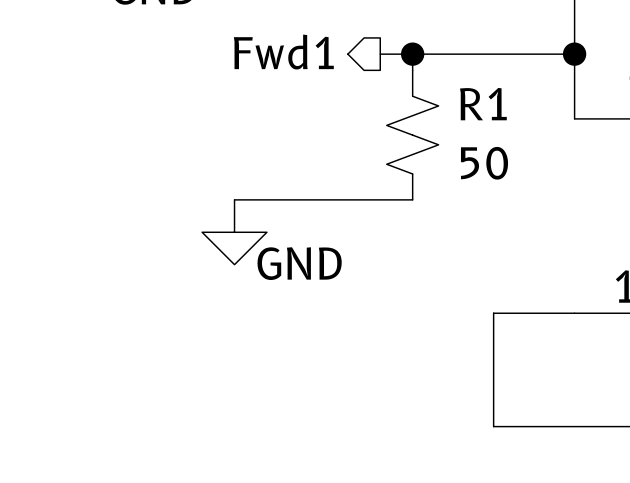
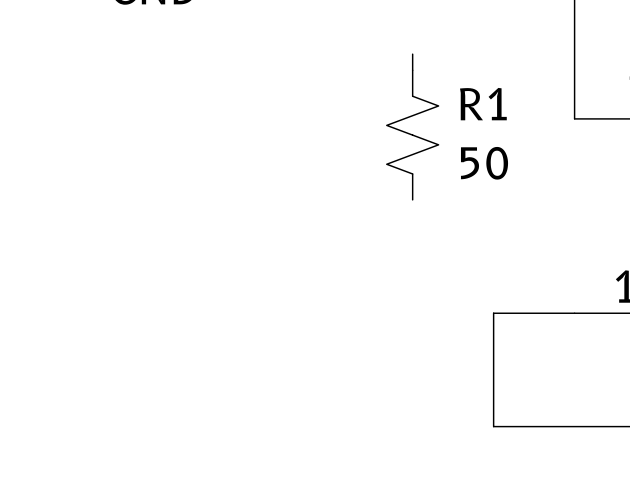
hierarchical label: Fwd1 (283, 52) -> none
wire: (380, 54) (574, 54) -> none
junction: (412, 54) -> none
junction: (574, 54) -> none
wire: (234, 199) (412, 199) -> none
power symbol: GND (234, 232) -> none

